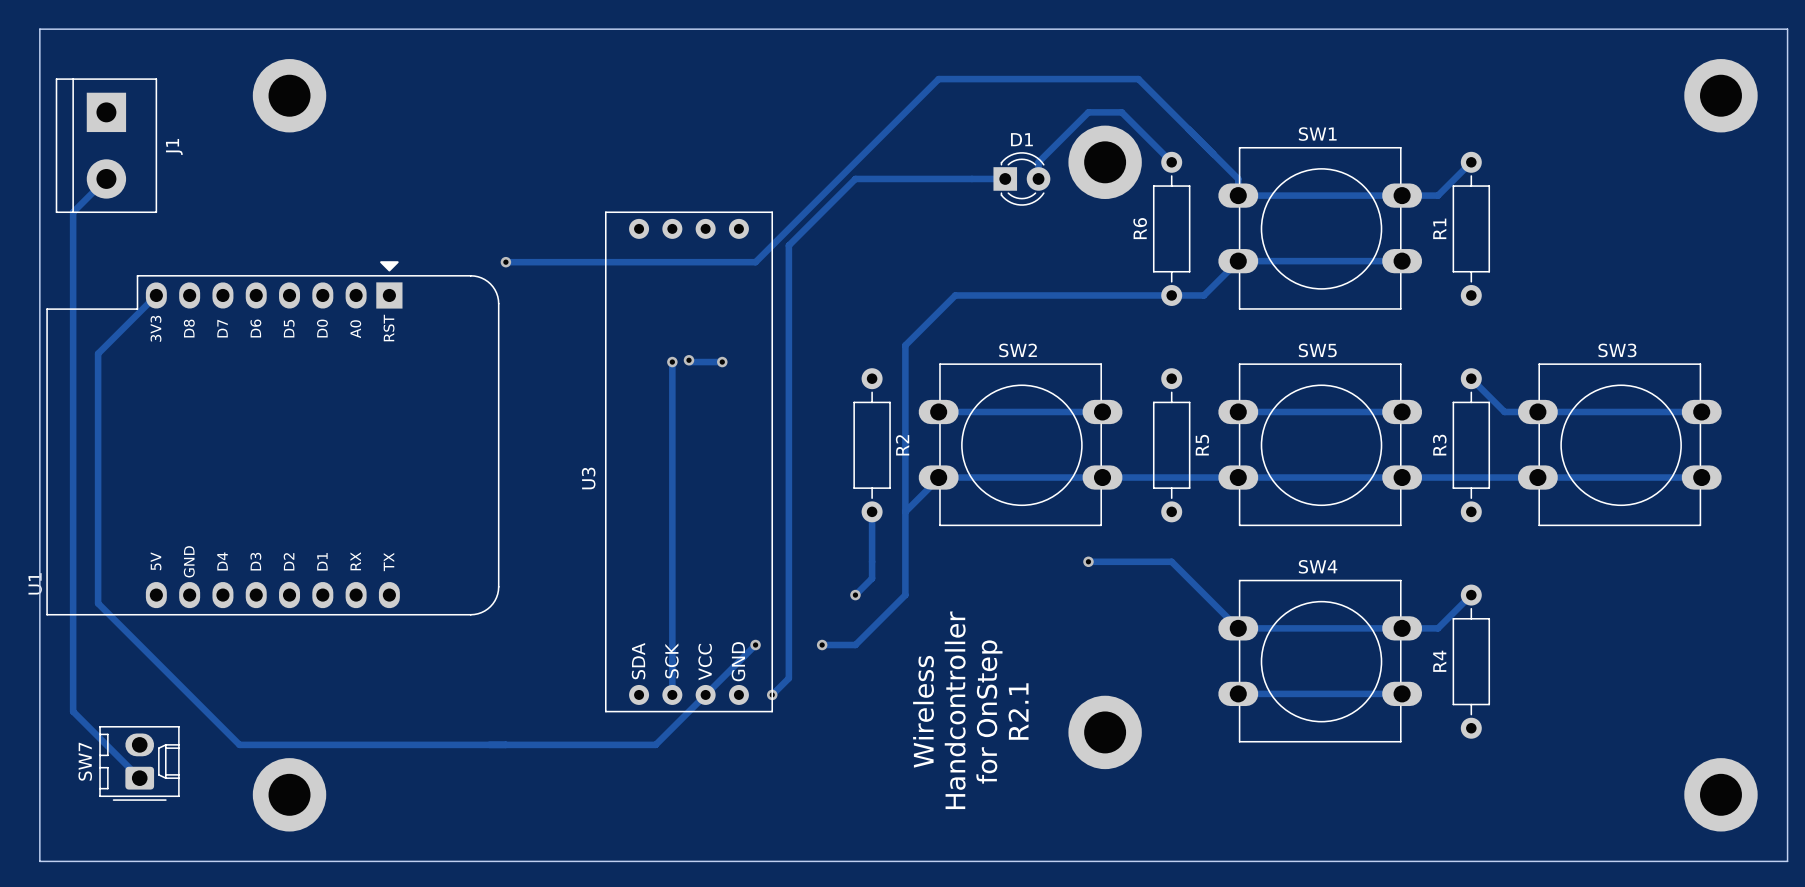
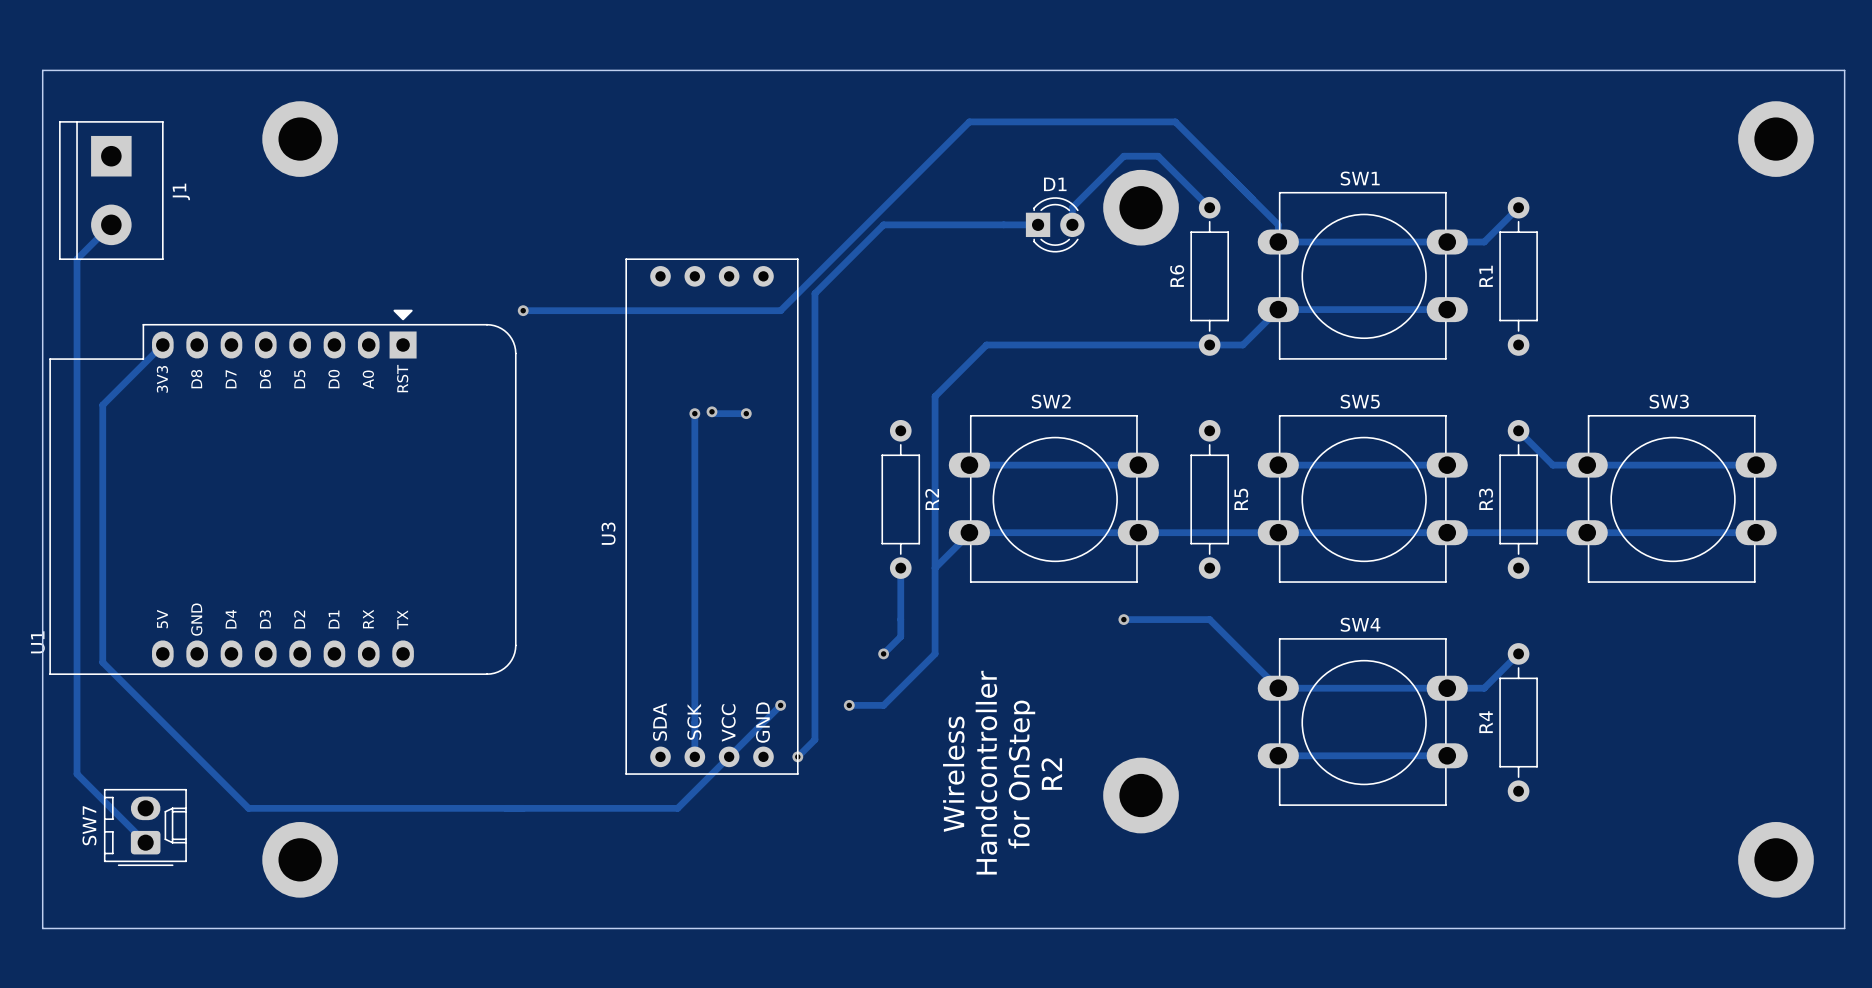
text: R2.1 (1018, 711) -> R2 (1051, 774)

